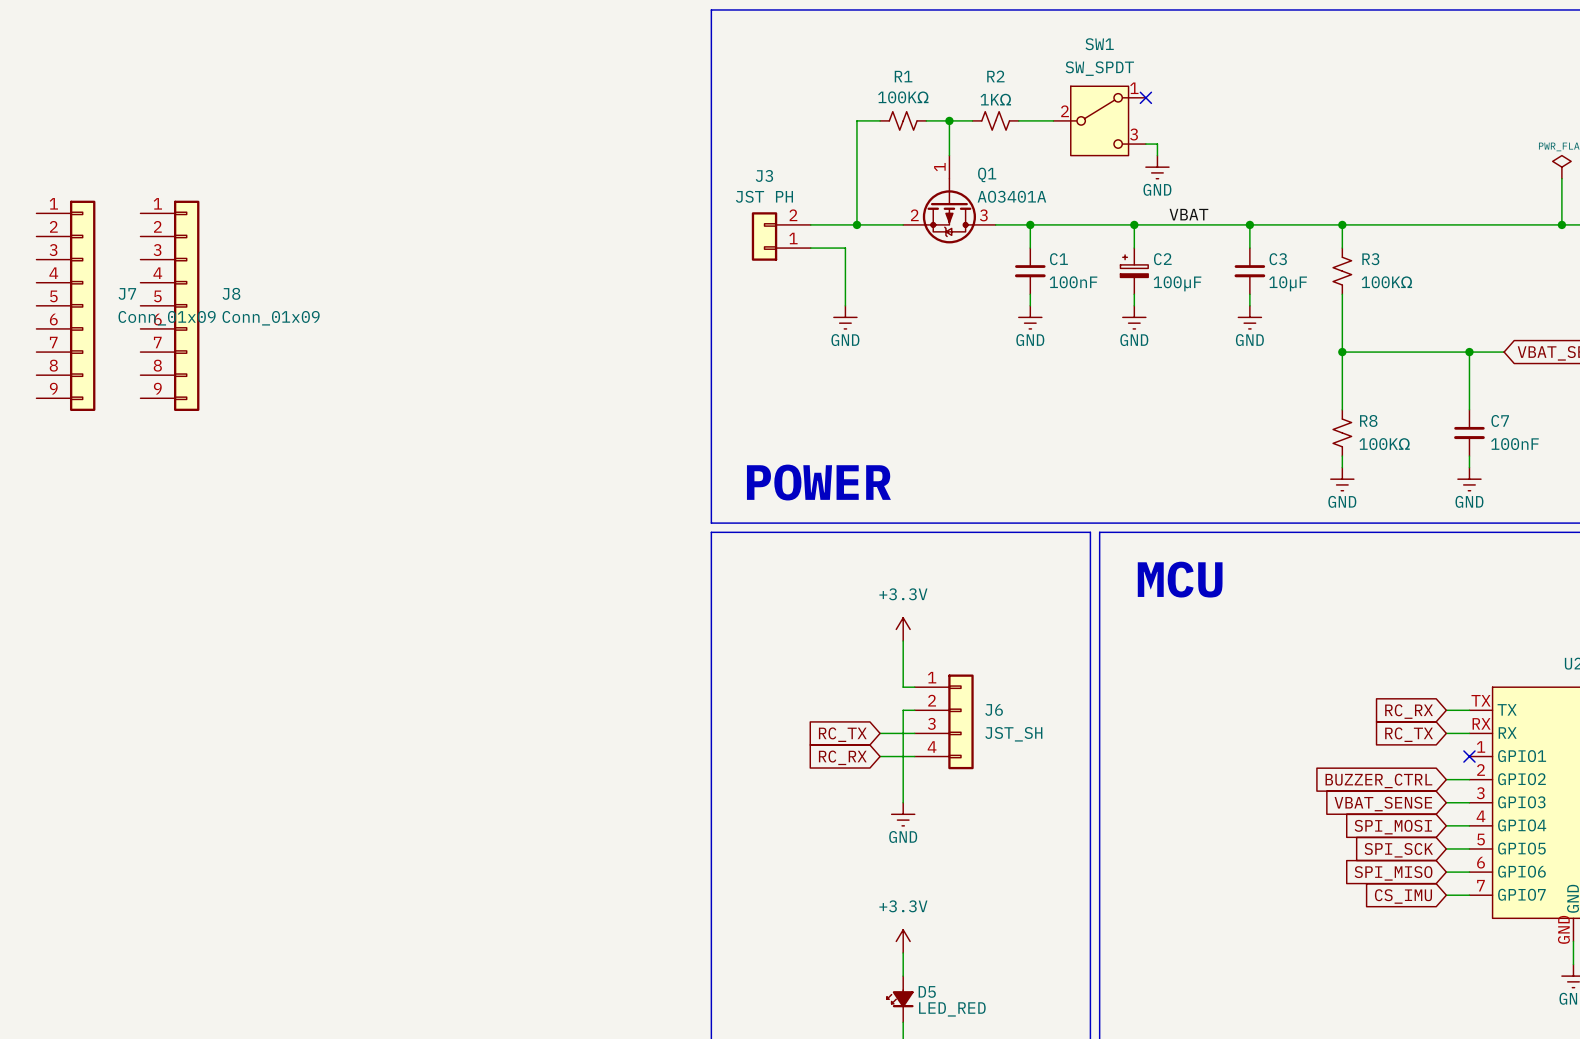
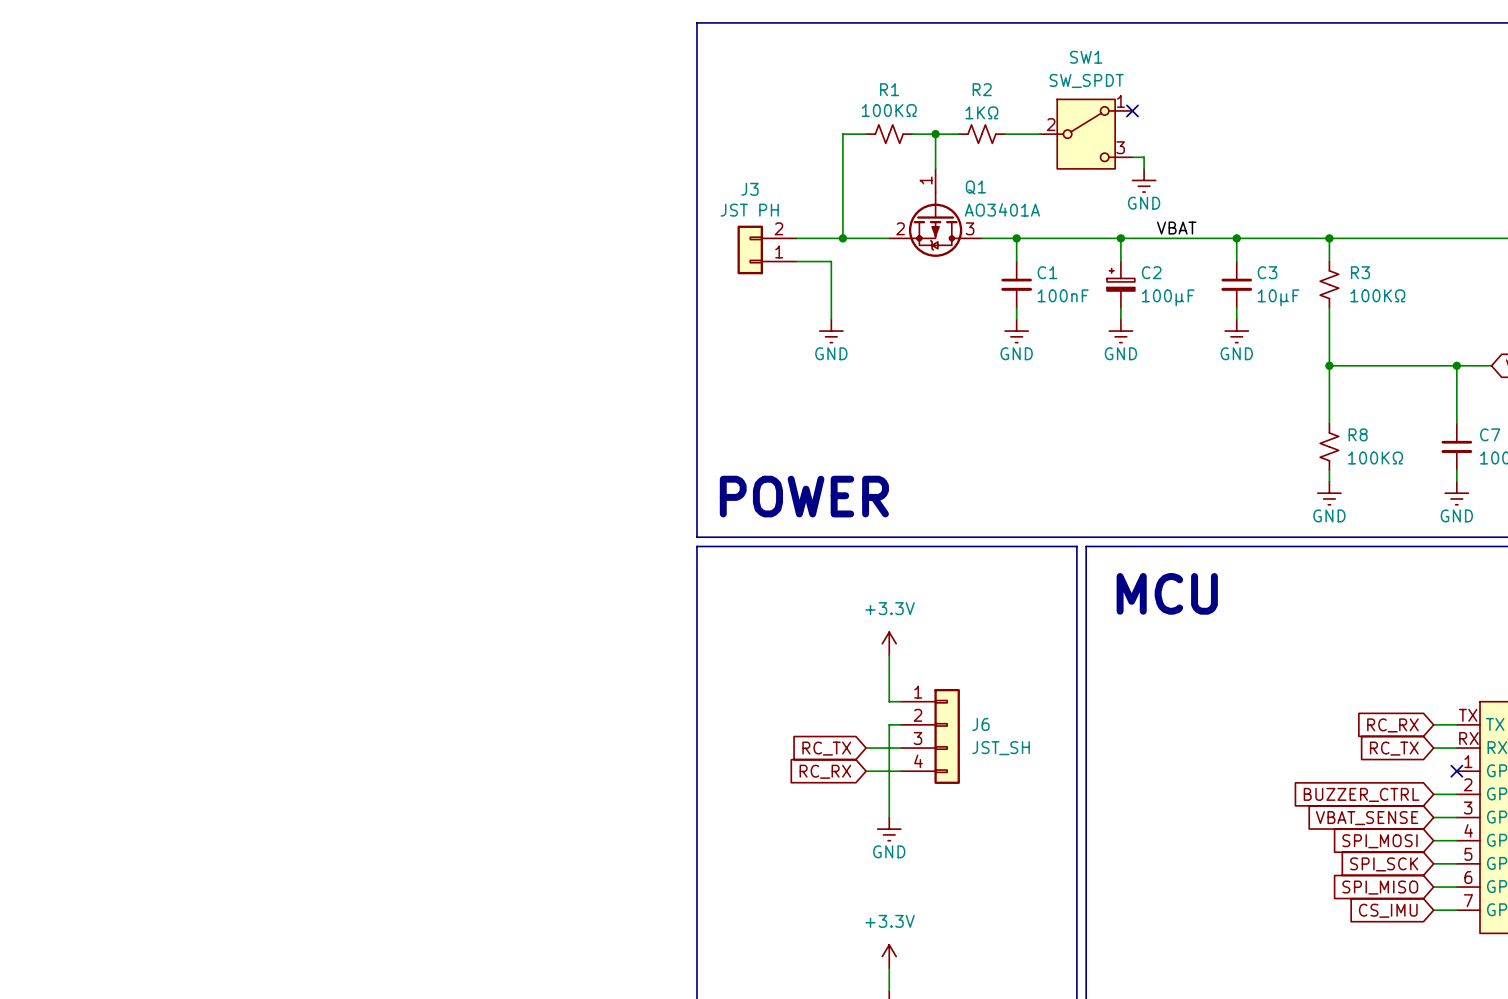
J7: Conn_01x09 (65, 305) -> none
J8: Conn_01x09 (169, 305) -> none

